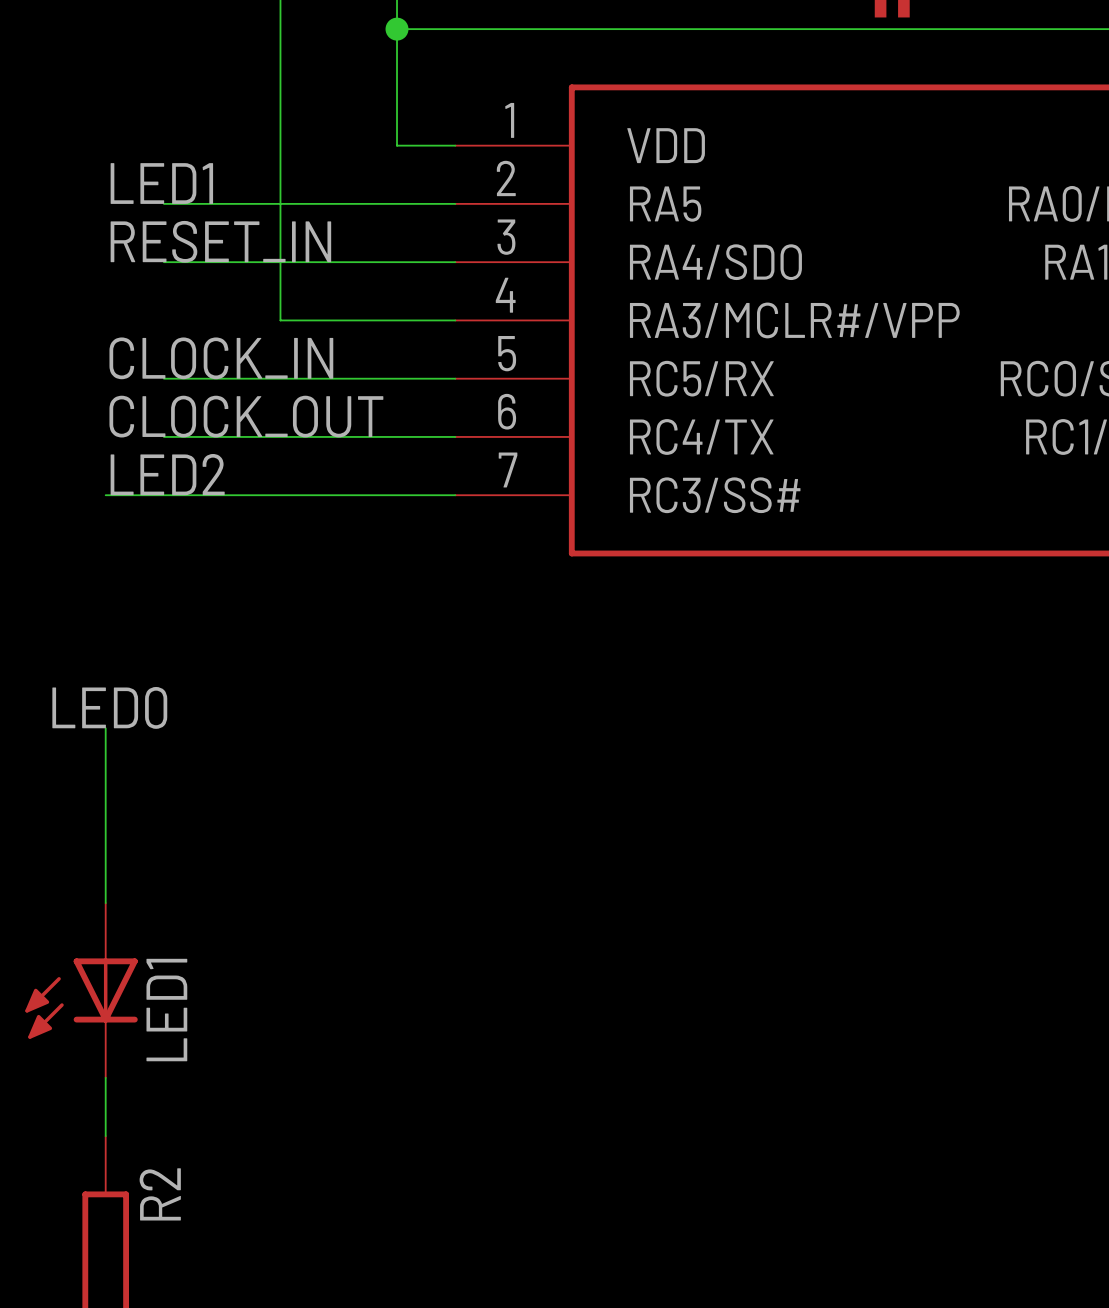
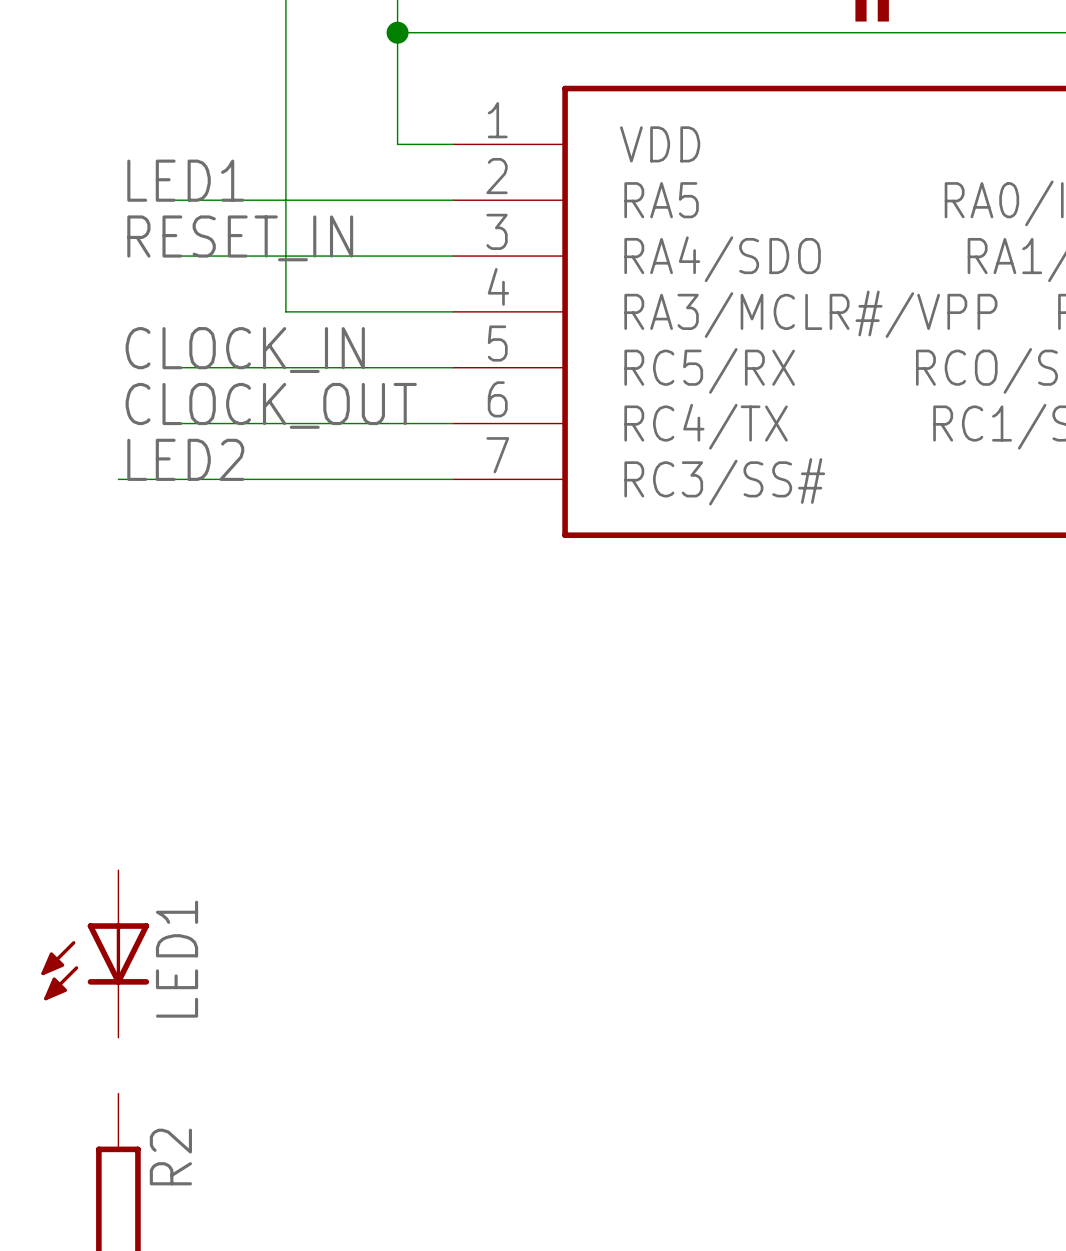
label: LED0 (109, 707) -> none
wire: (105, 728) (105, 903) -> none
wire: (105, 1077) (105, 1136) -> none

